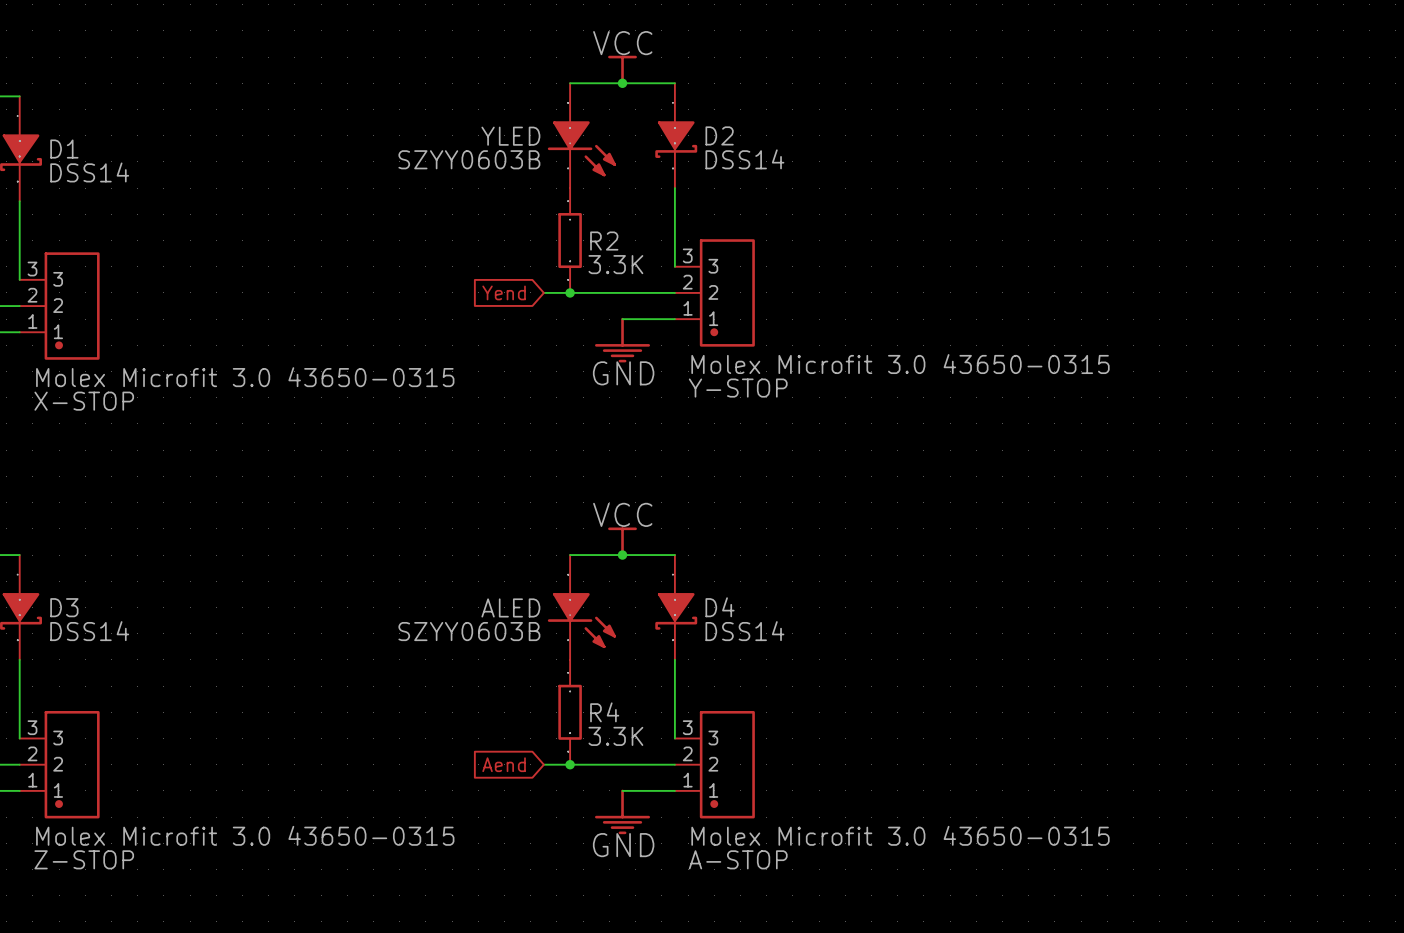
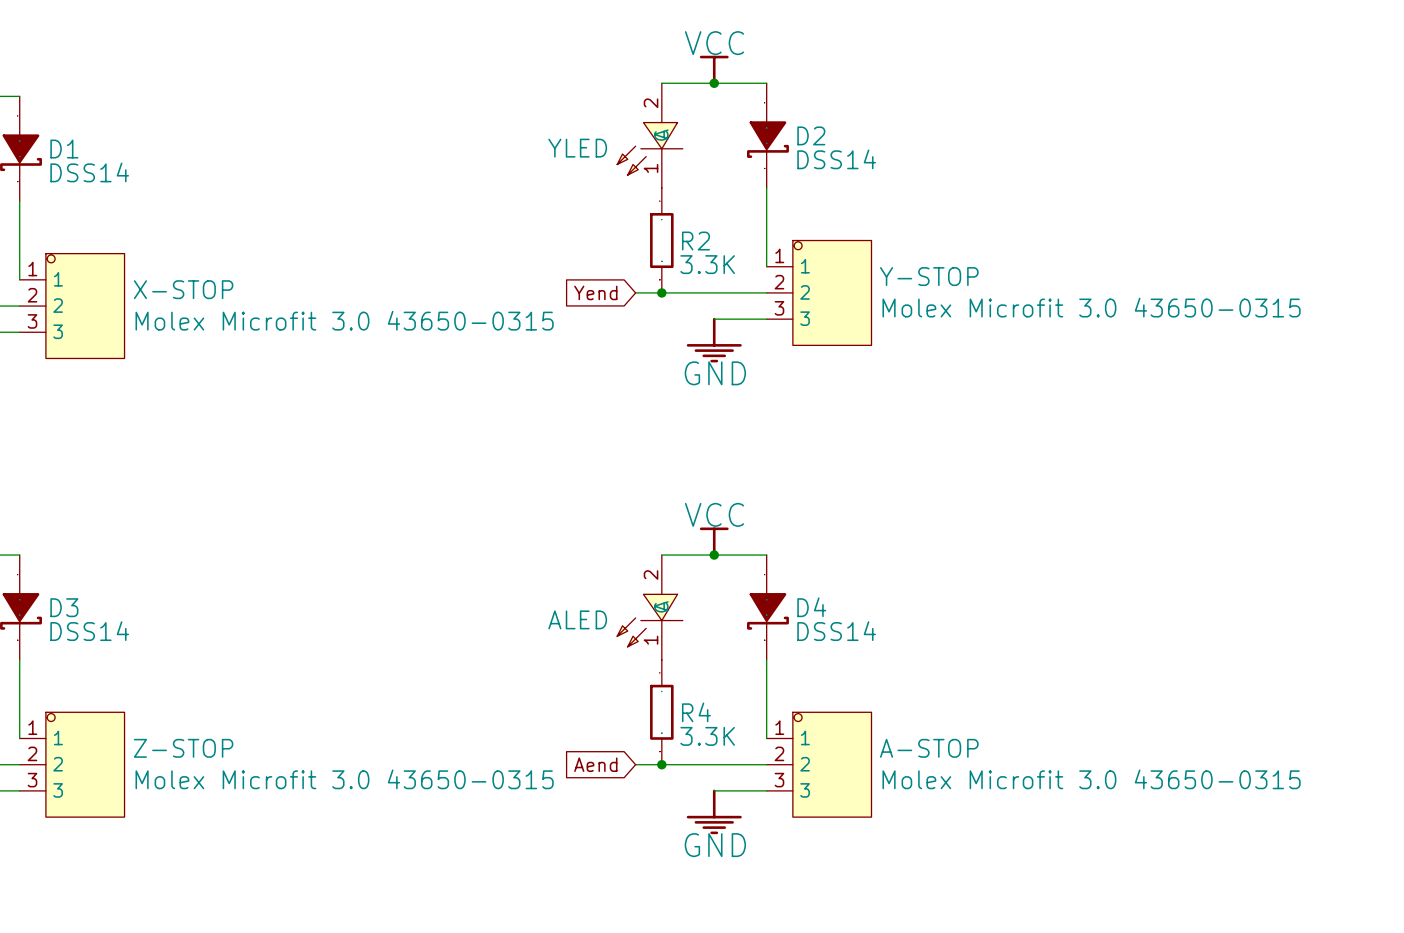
power symbol position: VCC (622, 70) -> VCC (714, 70)
wire: (570, 83) (661, 83) -> (674, 83) (766, 83)
junction: (622, 83) -> none
junction: none -> (714, 83)
YLED: SZYY0603B (581, 135) -> none
YLED: none -> (650, 135)
D2 position: (676, 135) -> (767, 135)
wire: (674, 188) (674, 266) -> (766, 188) (766, 266)
R2 position: (570, 240) -> (661, 240)
global label position: Yend (504, 292) -> Yend (595, 292)
wire: (543, 292) (635, 292) -> (674, 292) (766, 292)
junction: (570, 292) -> none
junction: none -> (661, 292)
Y-STOP: Molex Microfit 3.0 43650-0315 (714, 292) -> none
Y-STOP: none -> Molex Microfit 3.0 43650-0315 (819, 292)
X-STOP: Molex Microfit 3.0 43650-0315 (59, 306) -> none
X-STOP: none -> Molex Microfit 3.0 43650-0315 (72, 306)
wire: (622, 319) (674, 319) -> (714, 319) (766, 319)
power symbol position: GND (622, 340) -> GND (714, 340)
power symbol position: VCC (622, 541) -> VCC (714, 541)
wire: (570, 555) (661, 555) -> (674, 555) (766, 555)
junction: (622, 555) -> none
junction: none -> (714, 555)
ALED: SZYY0603B (581, 607) -> none
ALED: none -> (650, 607)
D4 position: (676, 607) -> (767, 607)
wire: (674, 659) (674, 738) -> (766, 659) (766, 738)
R4 position: (570, 712) -> (661, 712)
Z-STOP: Molex Microfit 3.0 43650-0315 (59, 764) -> none
Z-STOP: none -> Molex Microfit 3.0 43650-0315 (72, 764)
global label position: Aend (504, 764) -> Aend (595, 764)
wire: (543, 764) (635, 764) -> (674, 764) (766, 764)
junction: (570, 764) -> none
junction: none -> (661, 764)
A-STOP: Molex Microfit 3.0 43650-0315 (714, 764) -> none
A-STOP: none -> Molex Microfit 3.0 43650-0315 (819, 764)
wire: (622, 790) (674, 790) -> (714, 790) (766, 790)
power symbol position: GND (622, 811) -> GND (714, 811)

